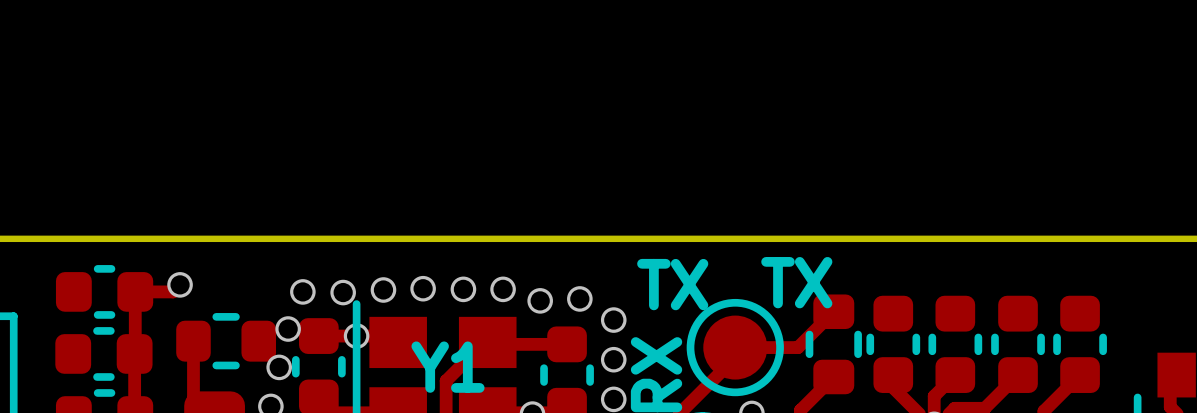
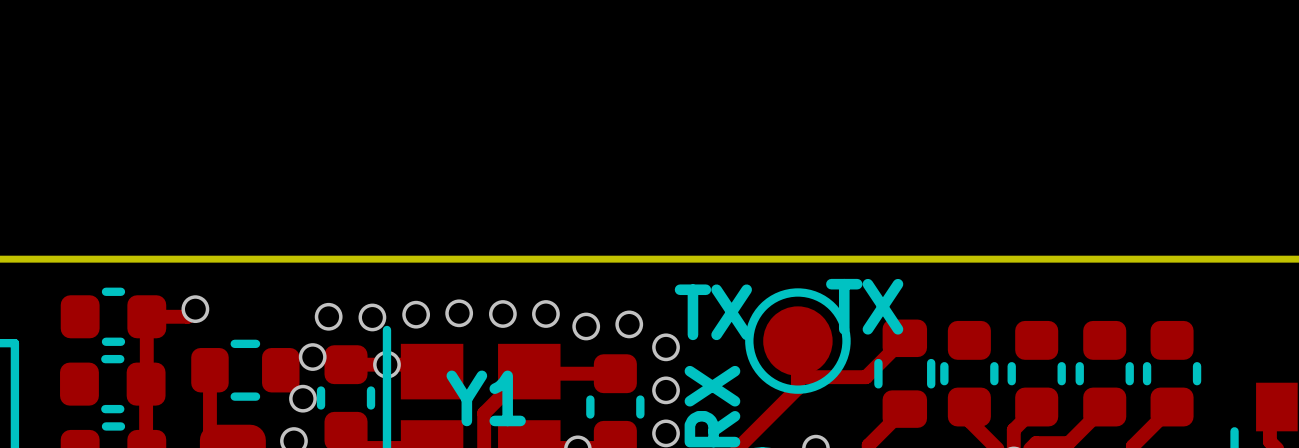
text position: TX (672, 284) -> TX (713, 312)
part position: (735, 347) -> (797, 341)

